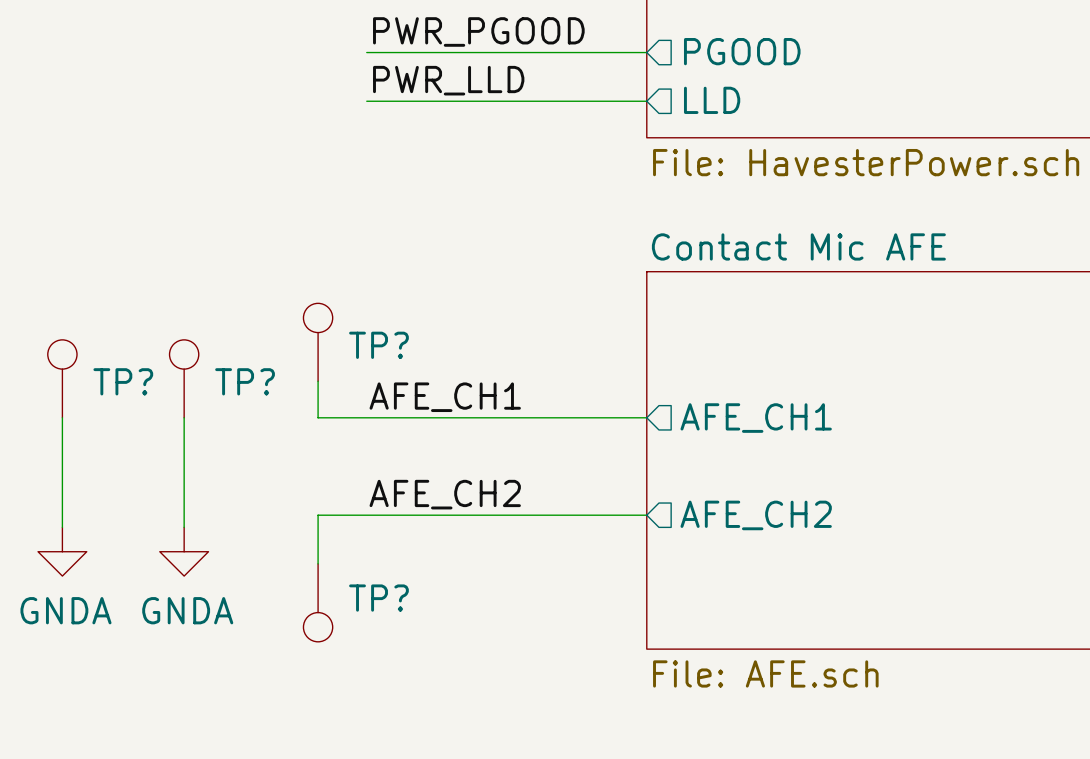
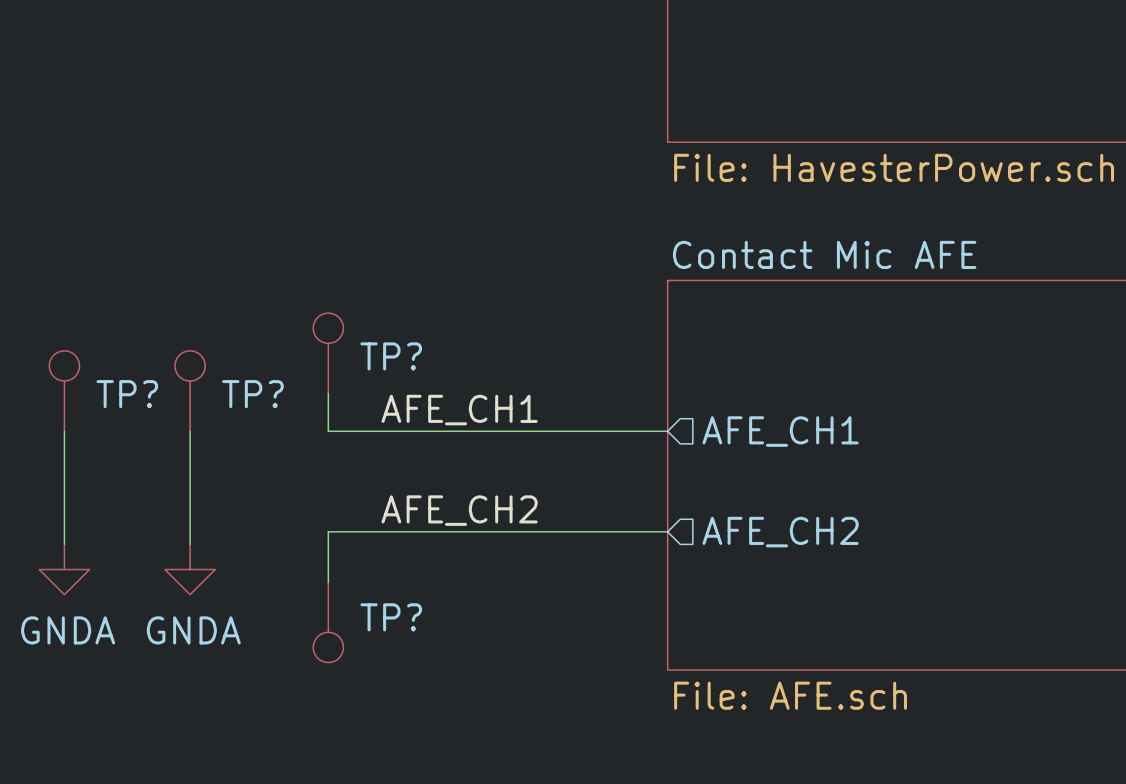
label: PWR_PGOOD (478, 31) -> none
sheet pin: PGOOD (742, 51) -> none
wire: (366, 52) (646, 52) -> none
label: PWR_LLD (448, 80) -> none
sheet pin: LLD (712, 100) -> none
wire: (366, 101) (646, 101) -> none

